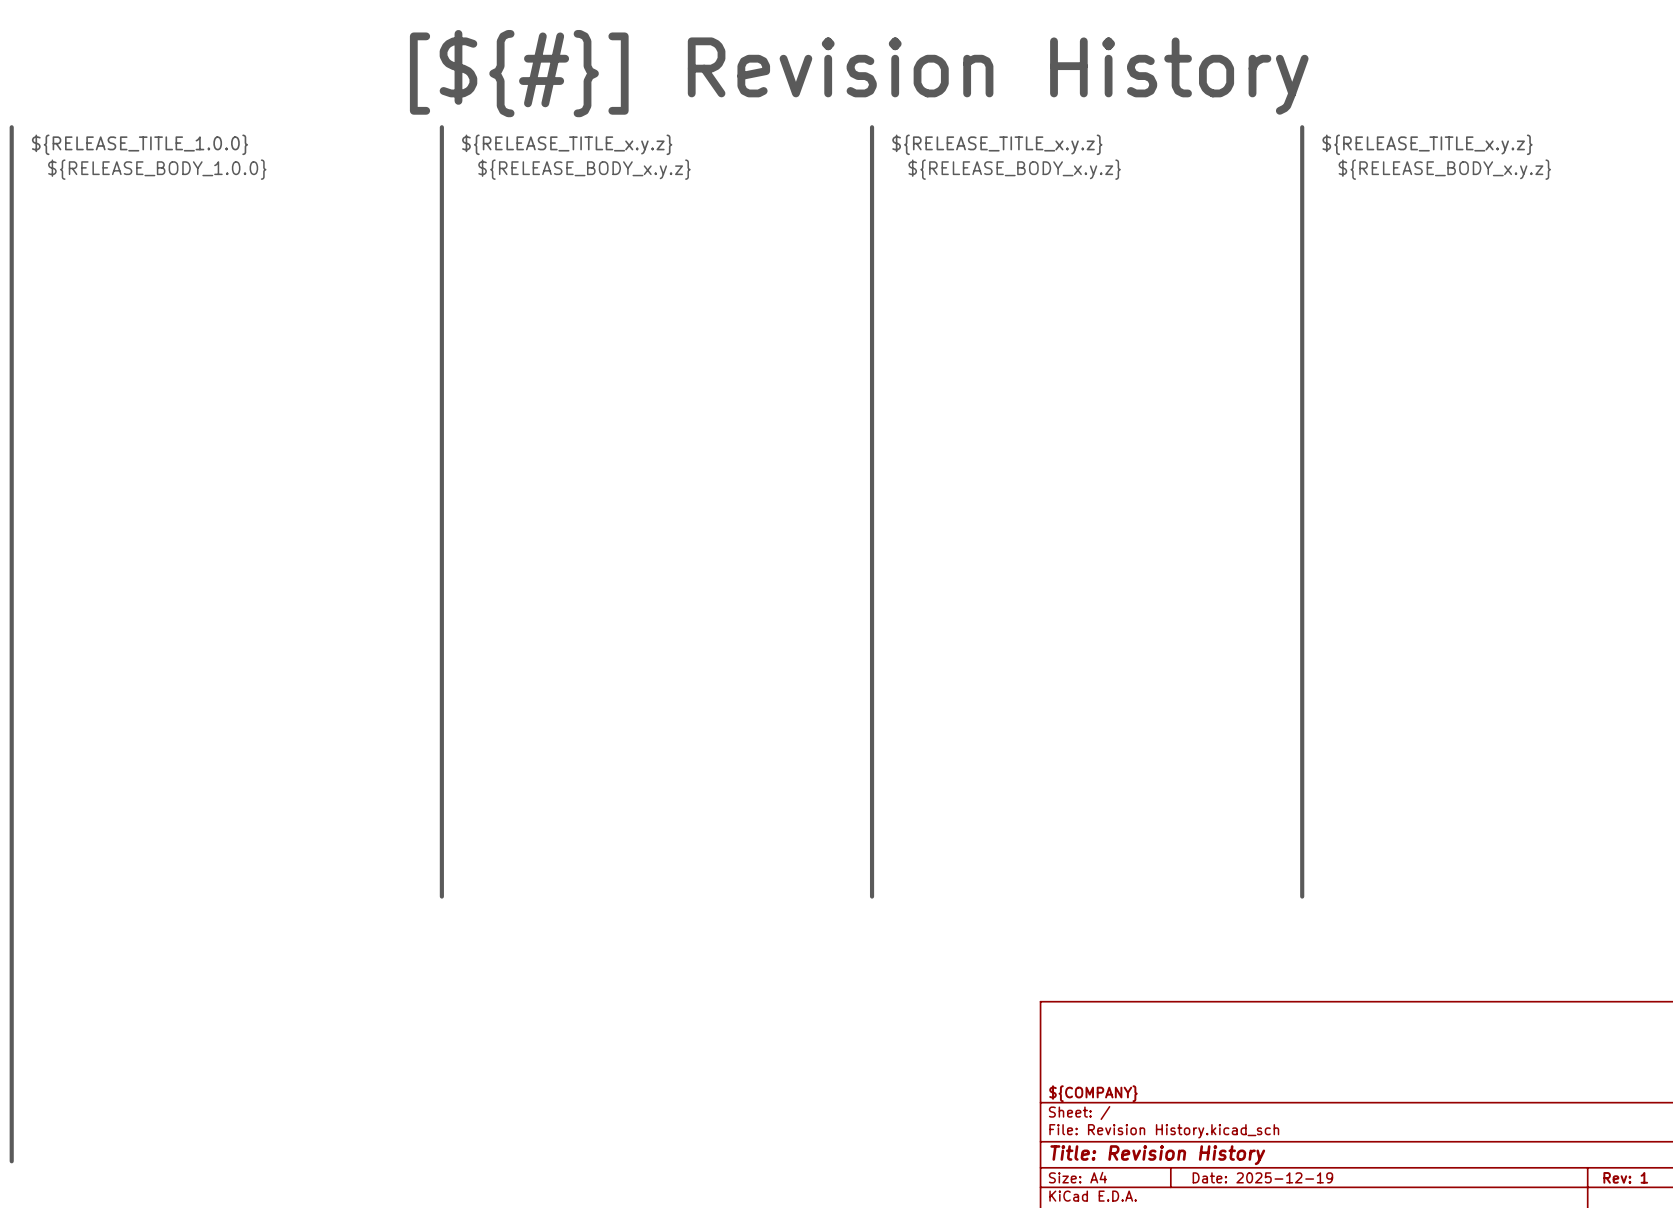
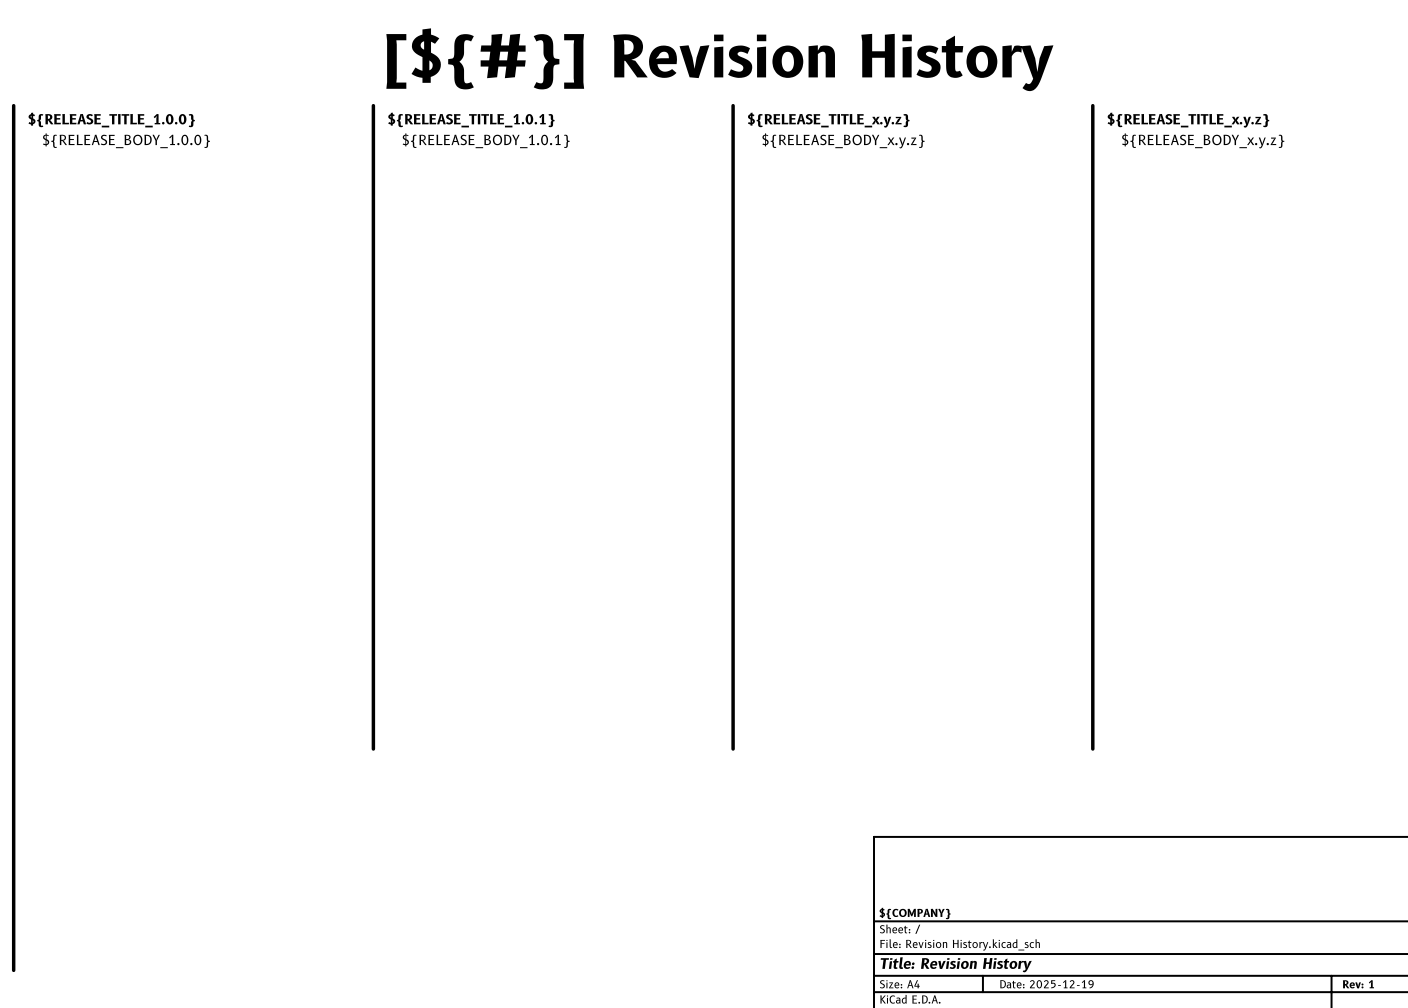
text: ${RELEASE_TITLE_x.y.z} (567, 144) -> ${RELEASE_TITLE_1.0.1} (471, 120)
text: ${RELEASE_BODY_x.y.z} (584, 169) -> ${RELEASE_BODY_1.0.1} (486, 140)

